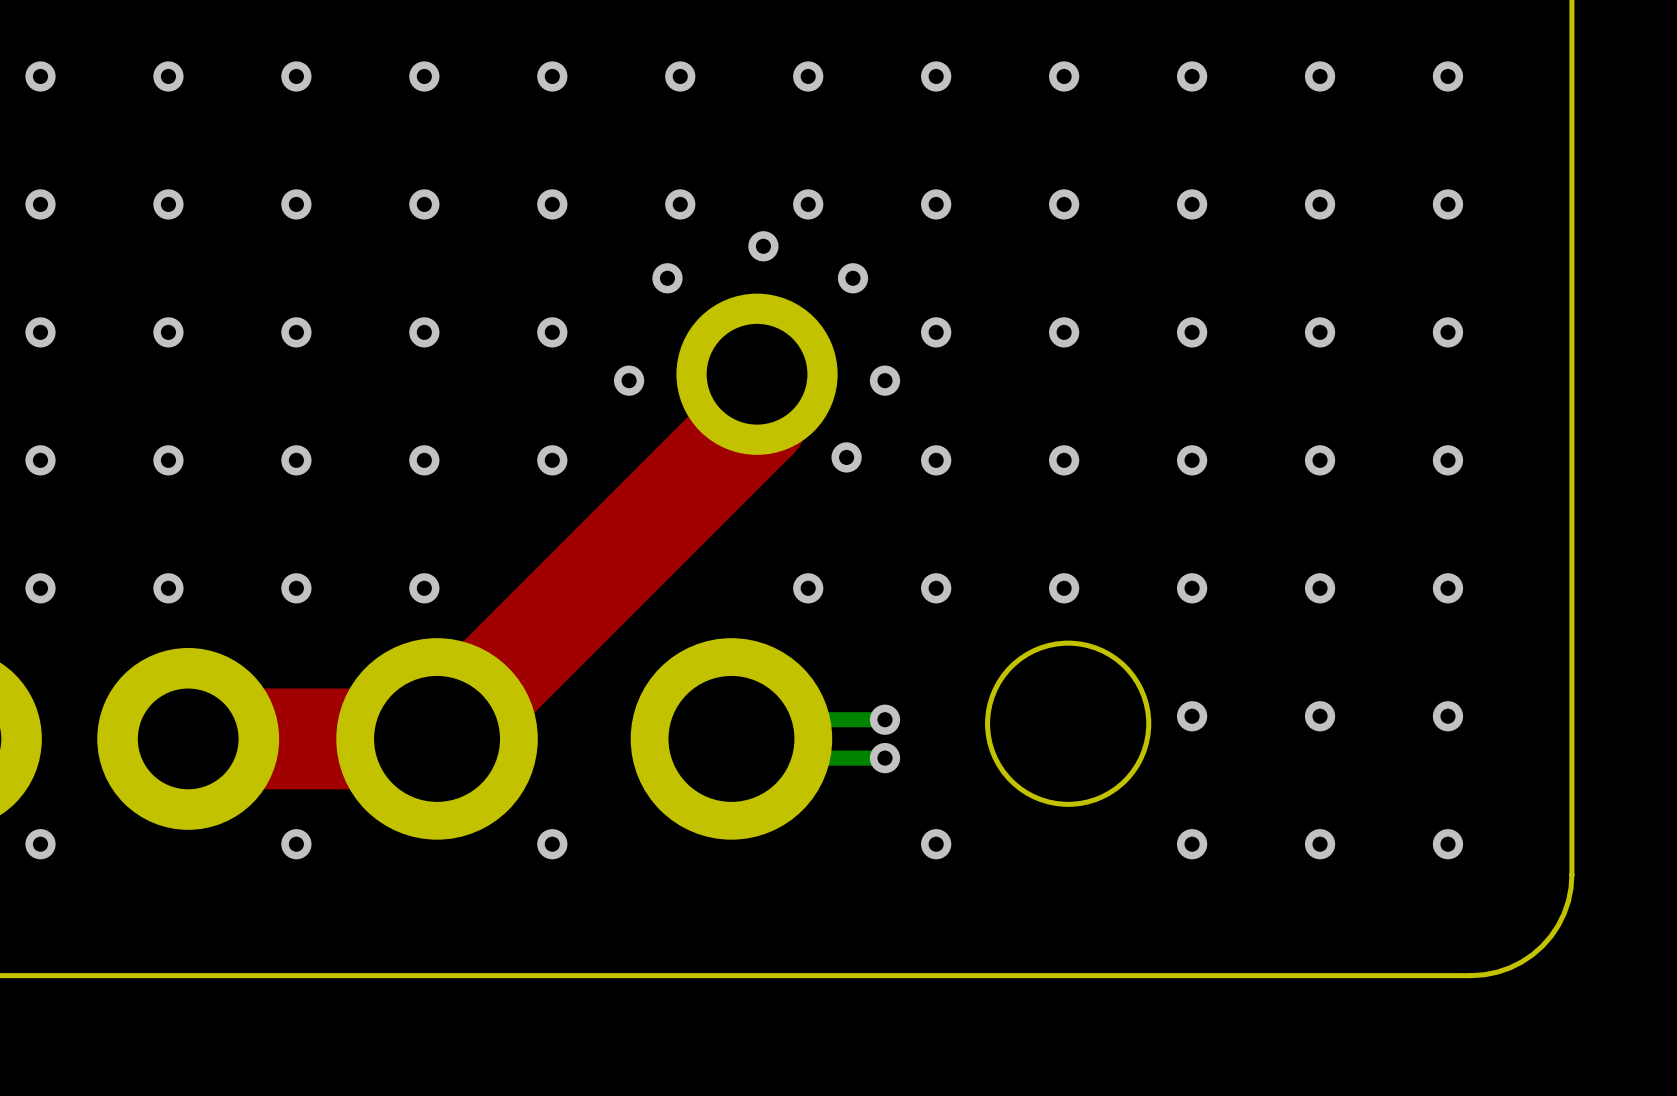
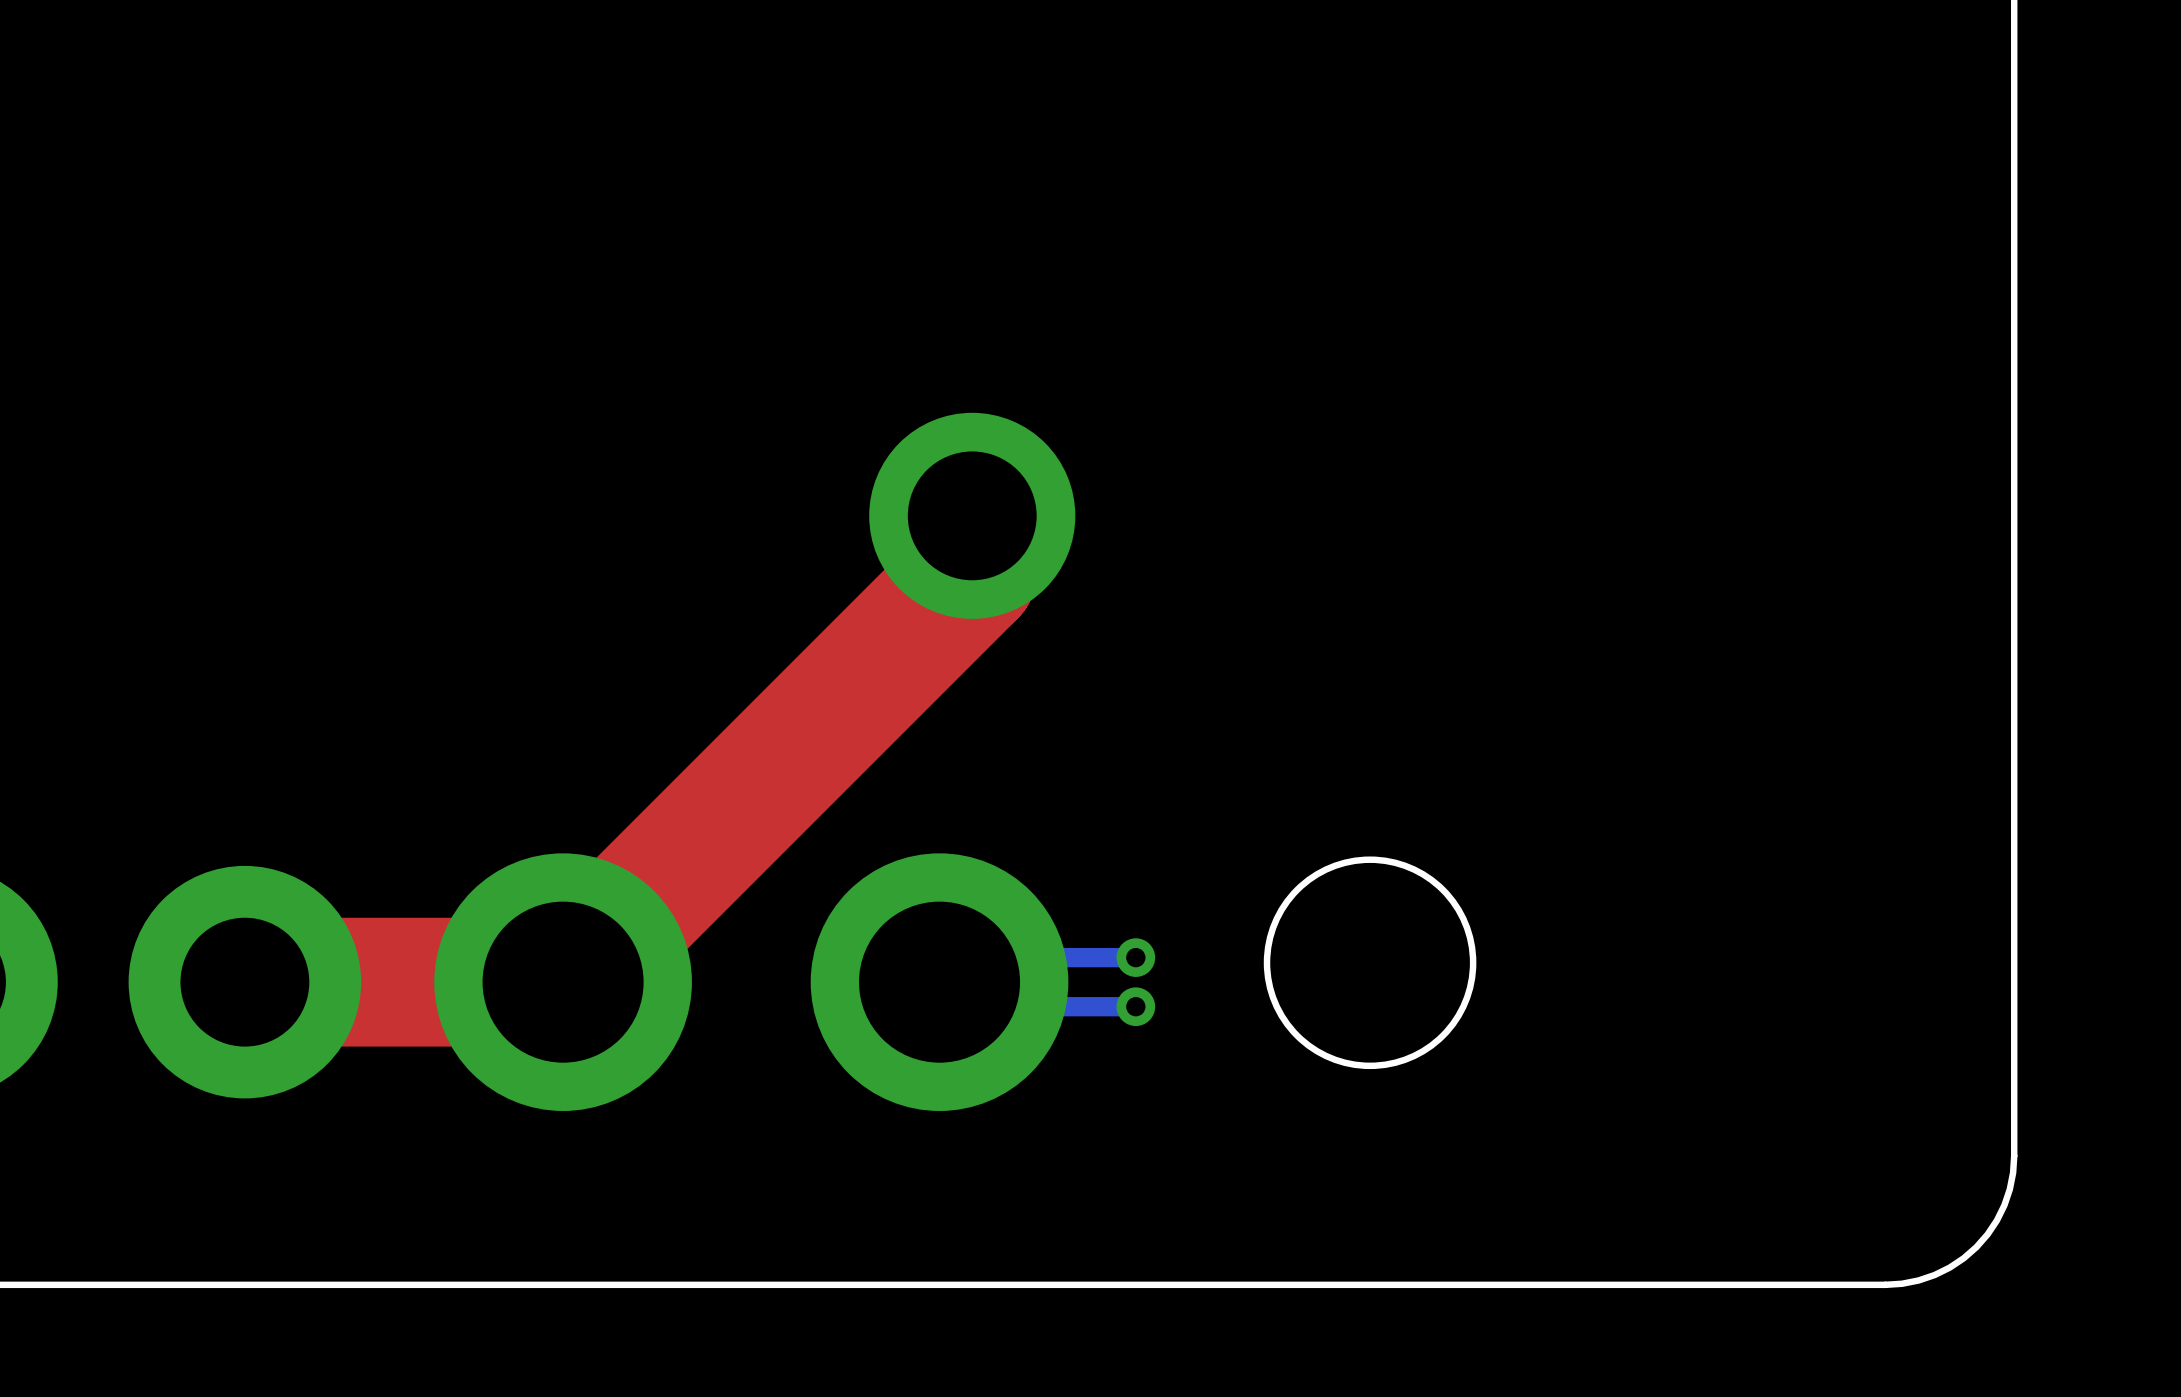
via: (40, 76) -> none
via: (168, 76) -> none
via: (296, 76) -> none
via: (424, 76) -> none
via: (552, 76) -> none
via: (680, 76) -> none
via: (808, 76) -> none
via: (936, 76) -> none
via: (1064, 76) -> none
via: (1192, 76) -> none
via: (1320, 76) -> none
via: (1447, 76) -> none
via: (40, 204) -> none
via: (168, 204) -> none
via: (296, 204) -> none
via: (424, 204) -> none
via: (552, 204) -> none
via: (680, 204) -> none
via: (808, 204) -> none
via: (936, 204) -> none
via: (1064, 204) -> none
via: (1192, 204) -> none
via: (1320, 204) -> none
via: (1447, 204) -> none
via: (763, 246) -> none
via: (667, 278) -> none
via: (853, 278) -> none
via: (40, 332) -> none
via: (168, 332) -> none
via: (296, 332) -> none
via: (424, 332) -> none
via: (552, 332) -> none
via: (936, 332) -> none
via: (1064, 332) -> none
via: (1192, 332) -> none
via: (1320, 332) -> none
via: (1447, 332) -> none
via: (629, 380) -> none
via: (884, 380) -> none
via: (846, 457) -> none
via: (40, 460) -> none
via: (168, 460) -> none
via: (296, 460) -> none
via: (424, 460) -> none
via: (552, 460) -> none
via: (936, 460) -> none
via: (1064, 460) -> none
via: (1192, 460) -> none
via: (1320, 460) -> none
via: (1447, 460) -> none
via: (40, 588) -> none
via: (168, 588) -> none
via: (296, 588) -> none
via: (424, 588) -> none
via: (808, 588) -> none
via: (936, 588) -> none
via: (1064, 588) -> none
via: (1192, 588) -> none
via: (1320, 588) -> none
via: (1447, 588) -> none
via: (1192, 716) -> none
via: (1320, 716) -> none
via: (1447, 716) -> none
via: (40, 844) -> none
via: (296, 844) -> none
via: (552, 844) -> none
via: (936, 844) -> none
via: (1192, 844) -> none
via: (1320, 844) -> none
via: (1447, 844) -> none

